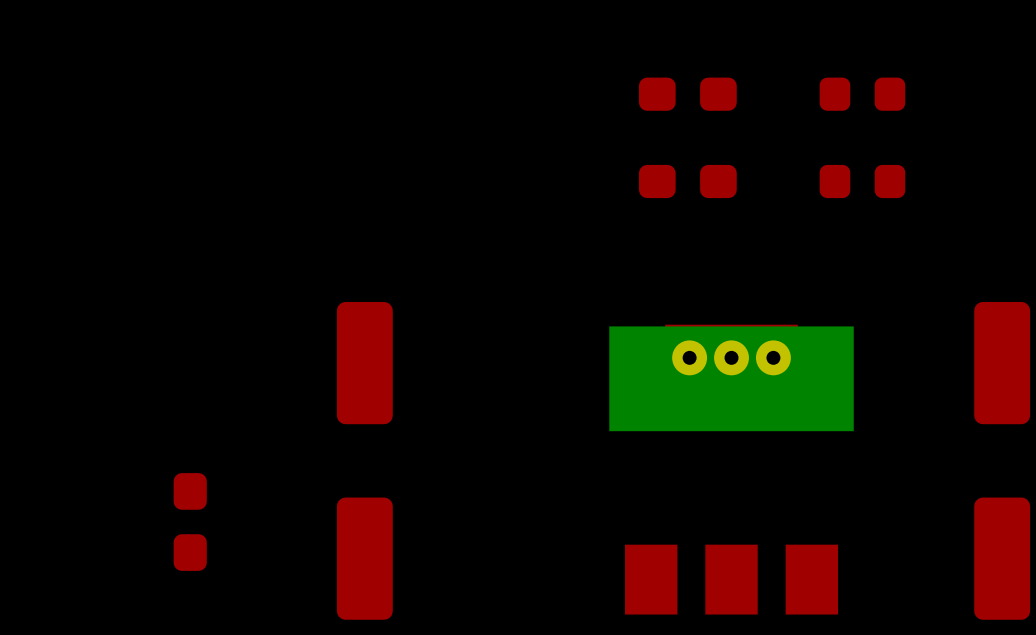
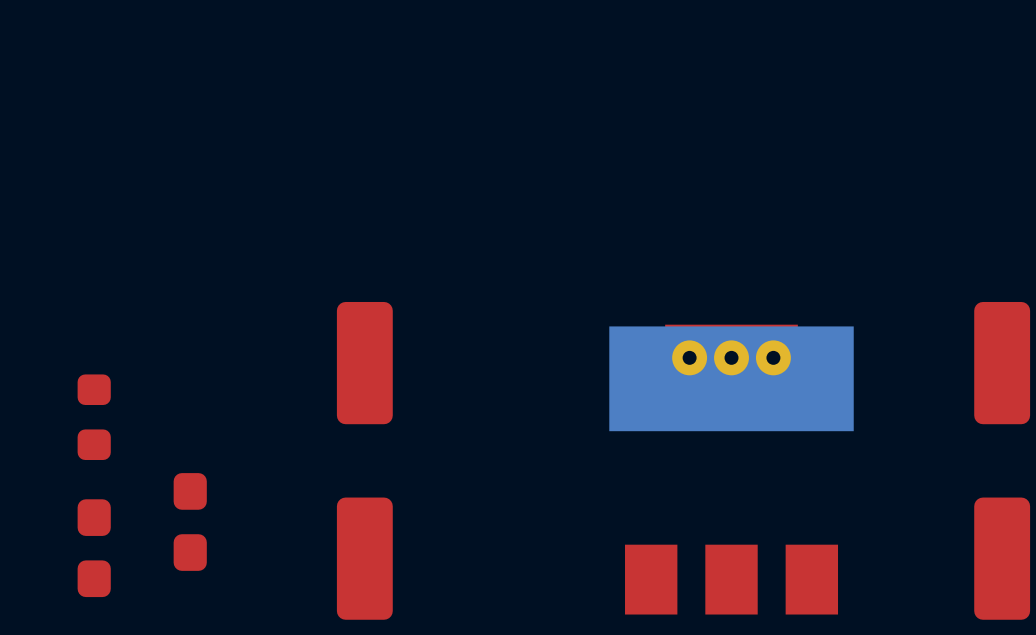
part: (687, 94) -> none
part: (862, 94) -> none
part: (687, 181) -> none
part: (862, 181) -> none
part: none -> (94, 417)
part: none -> (94, 548)

